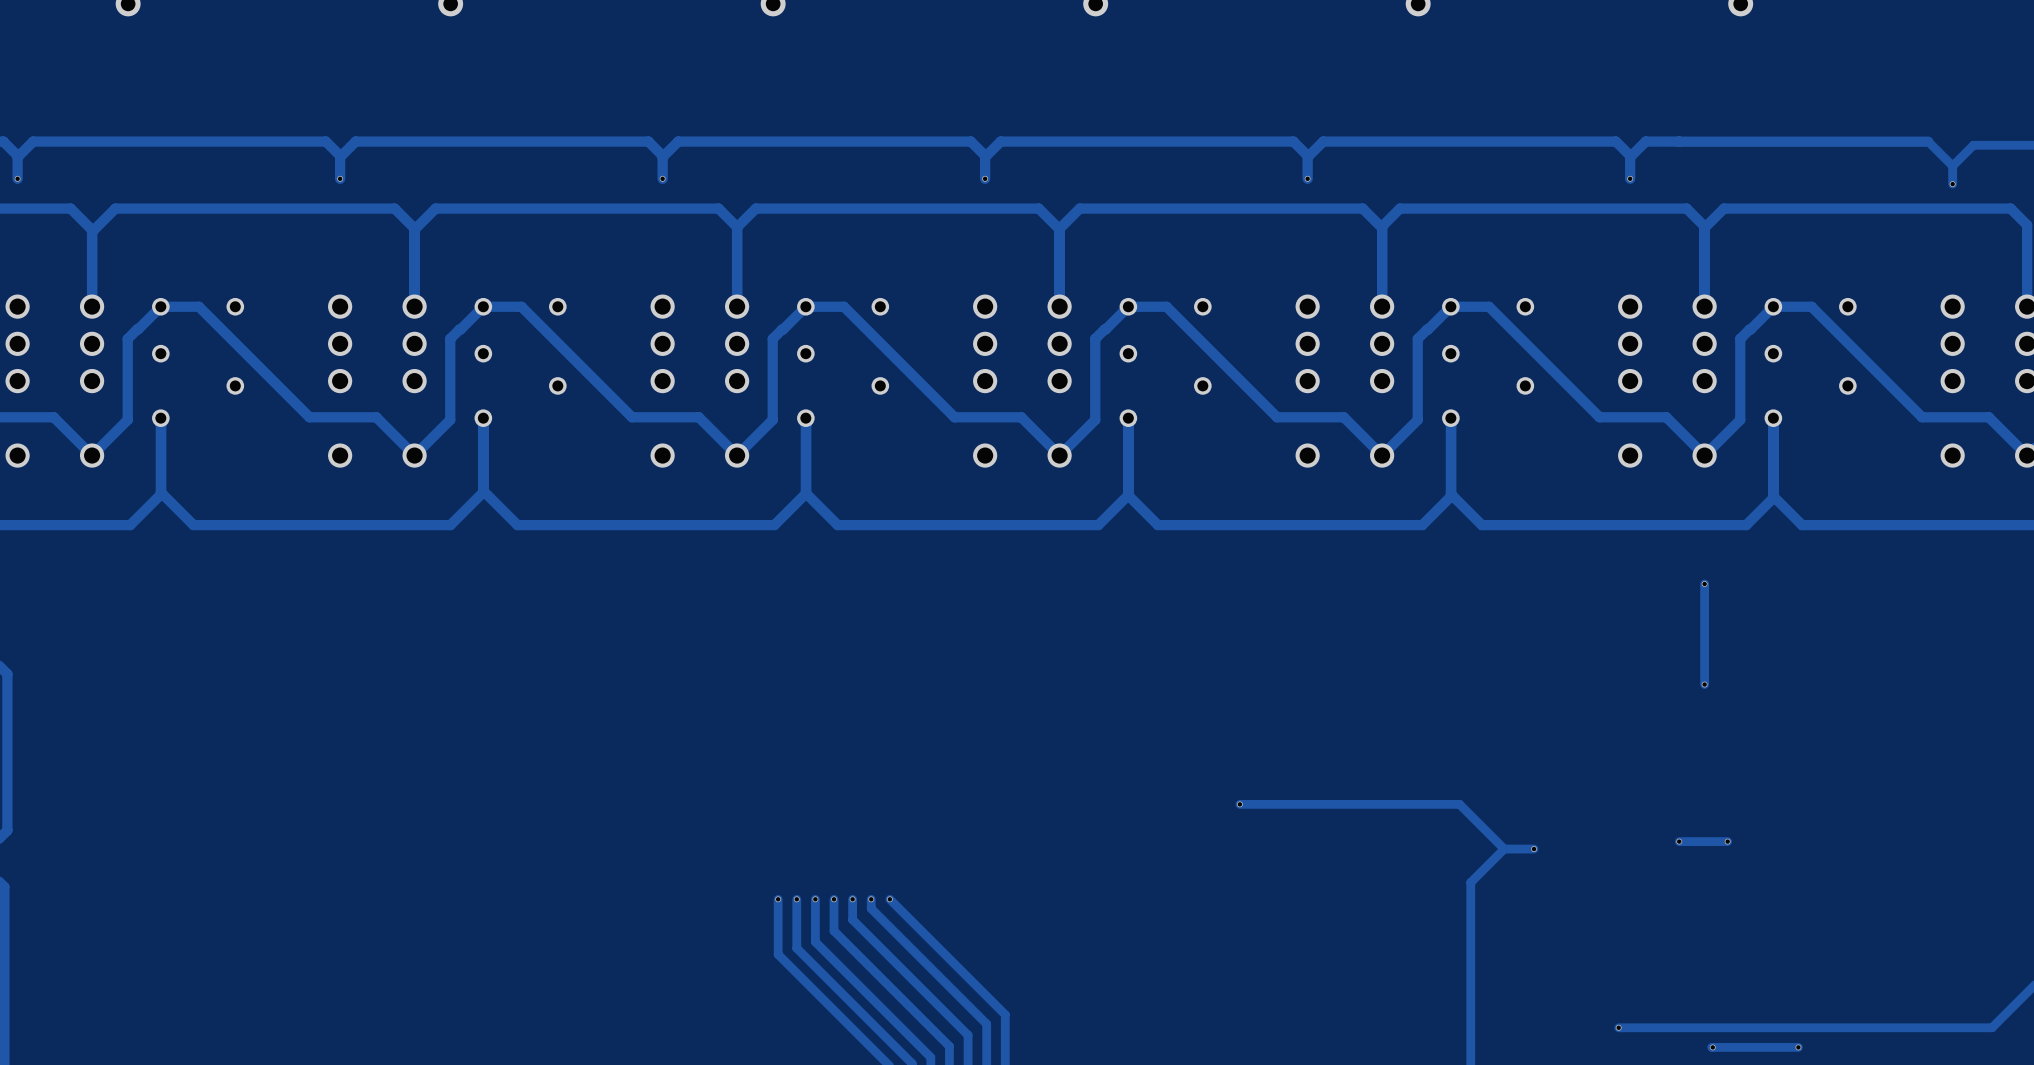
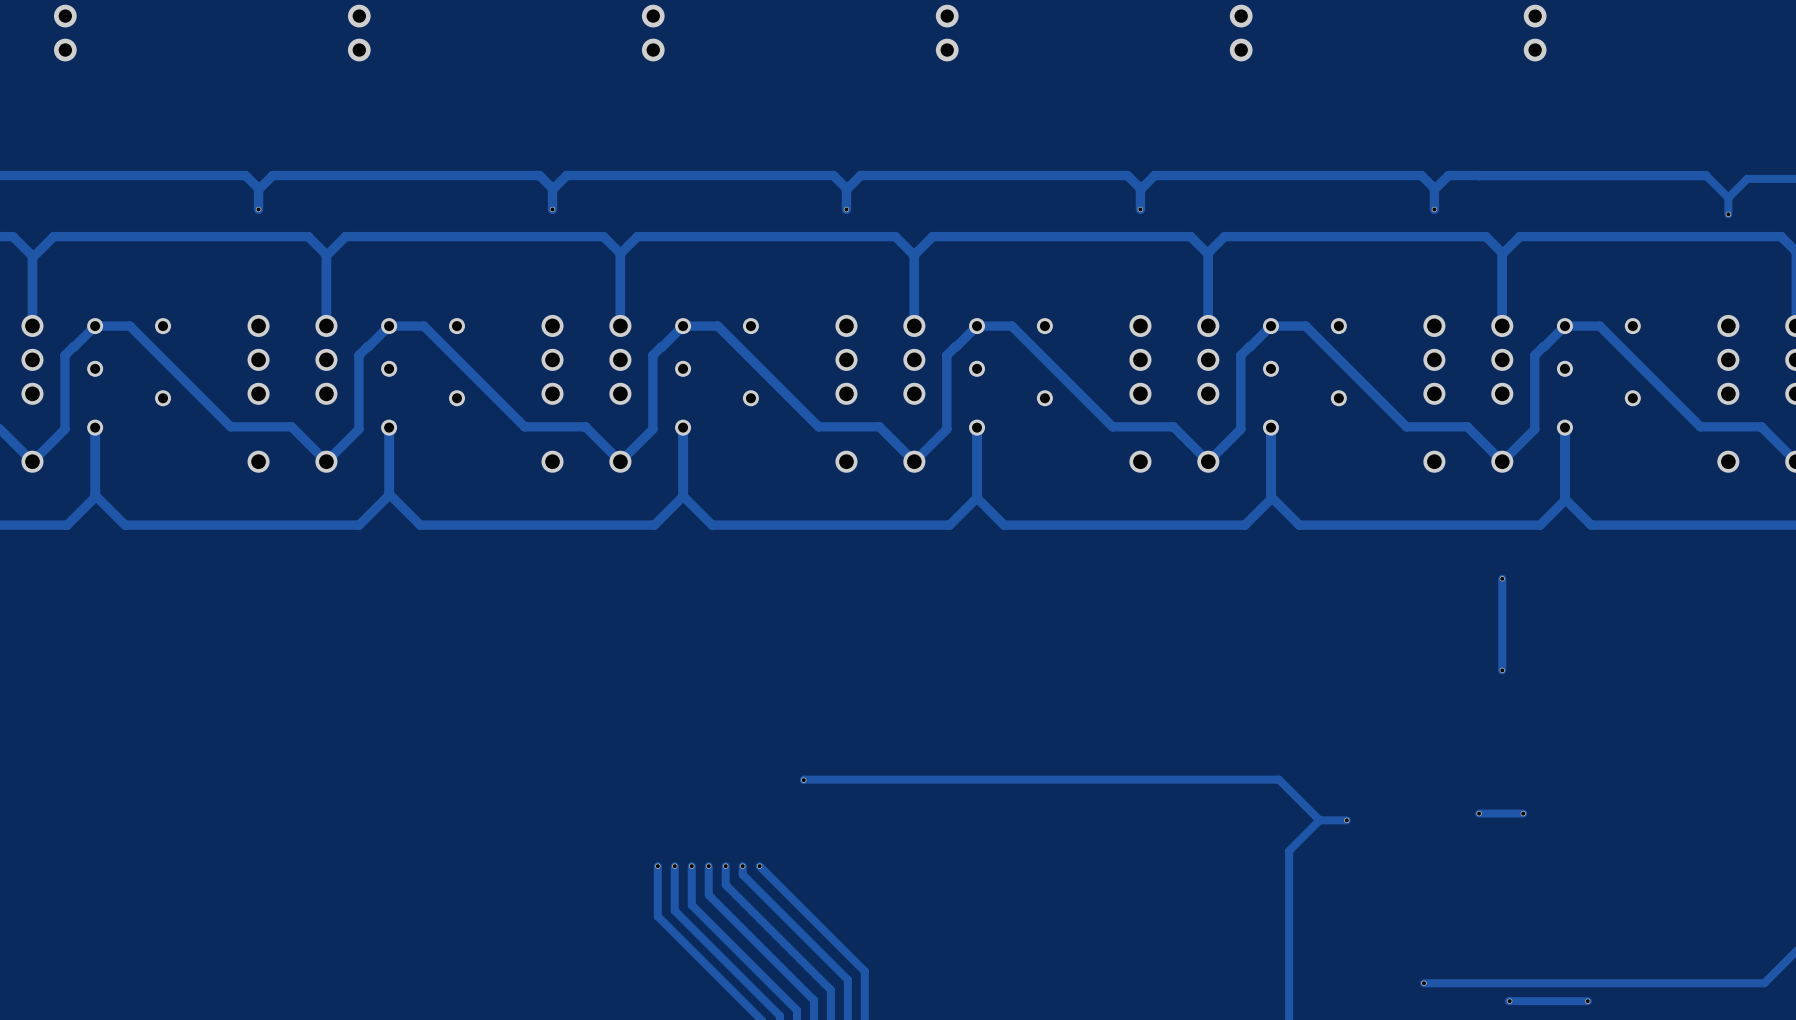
via: none -> (803, 780)
track: none -> (1078, 779) (803, 780)
via: (1239, 804) -> none

